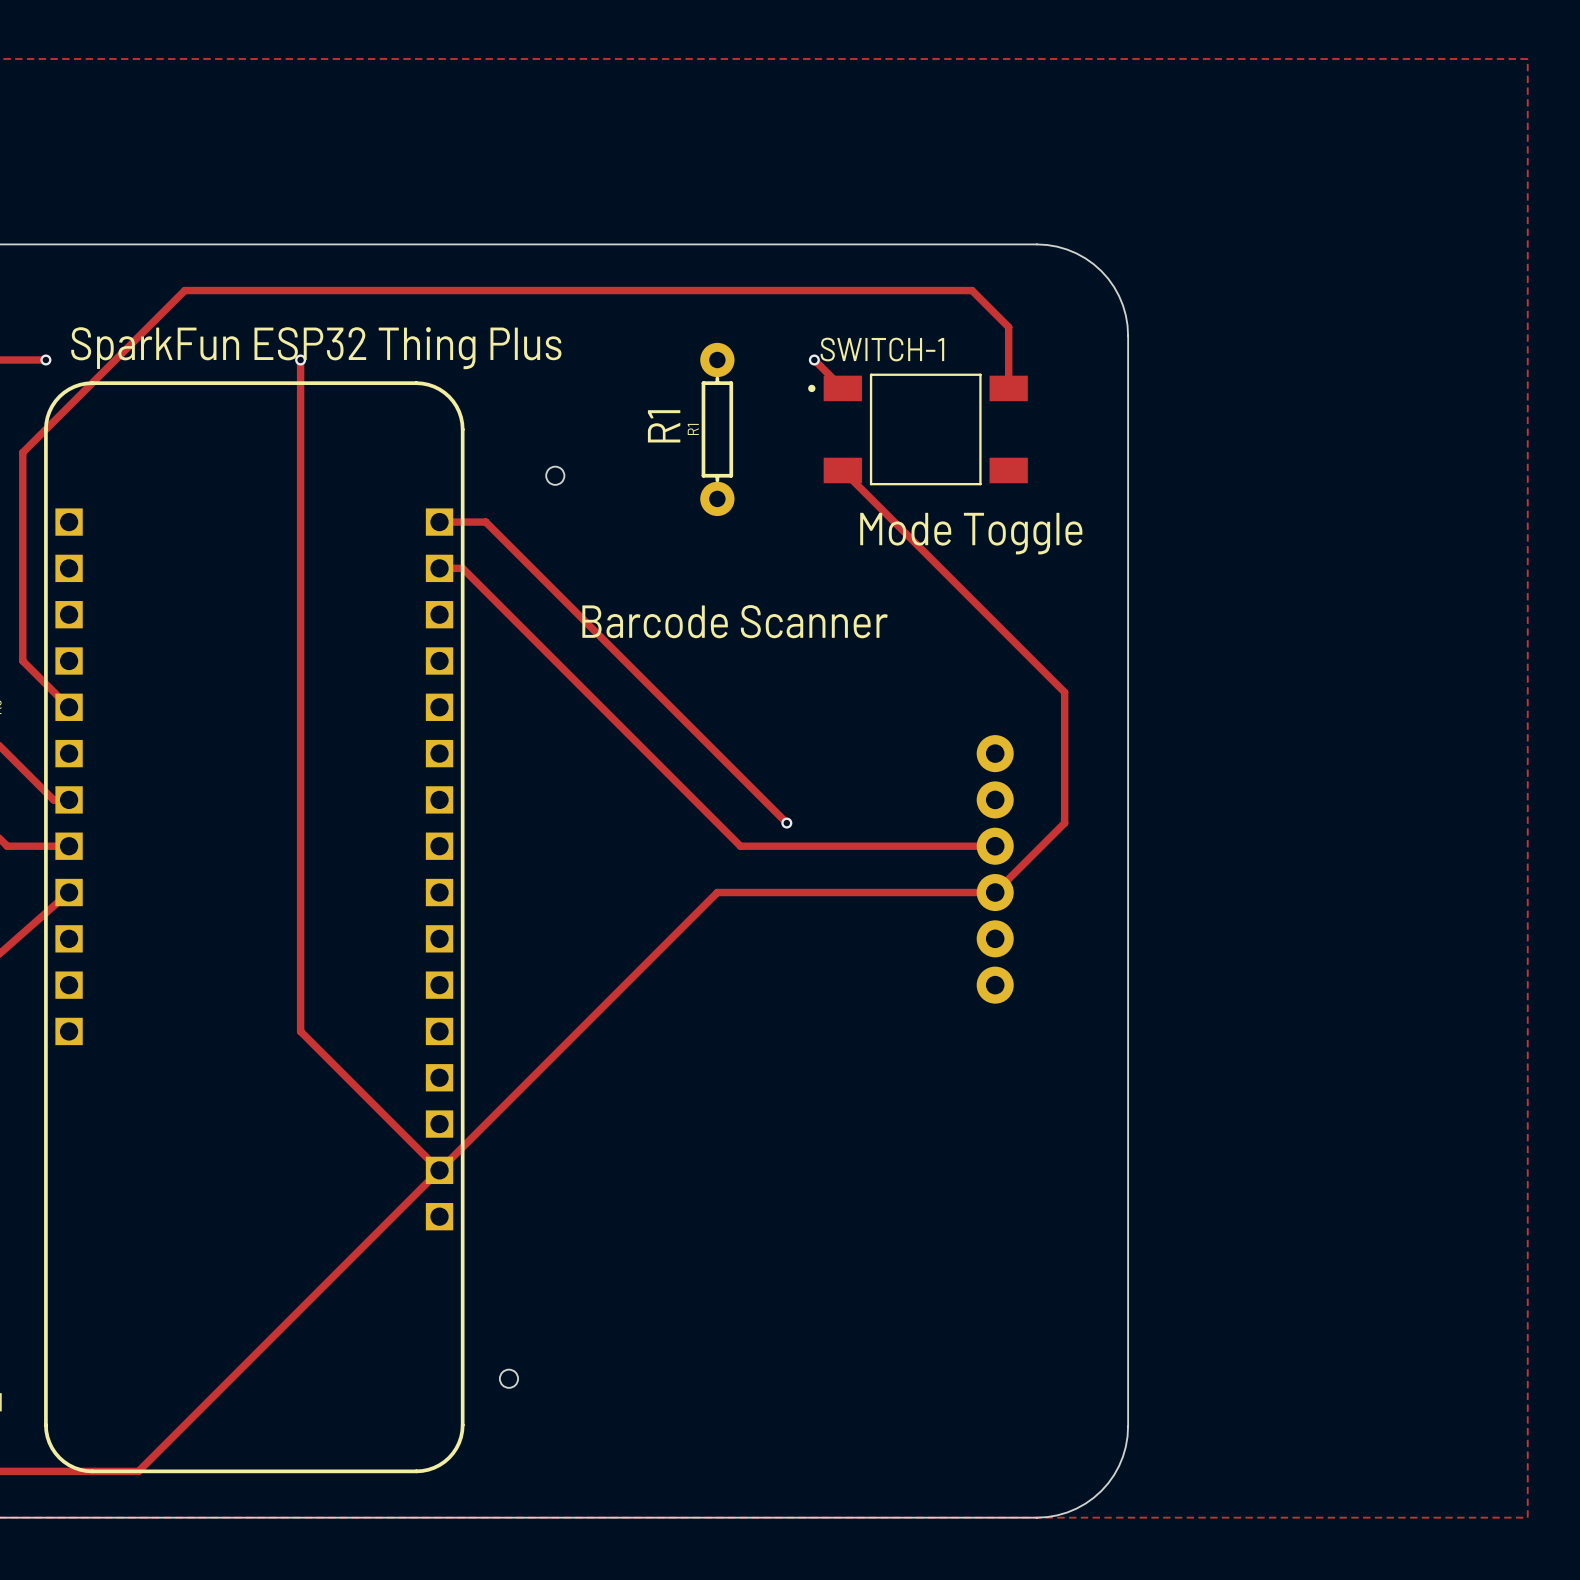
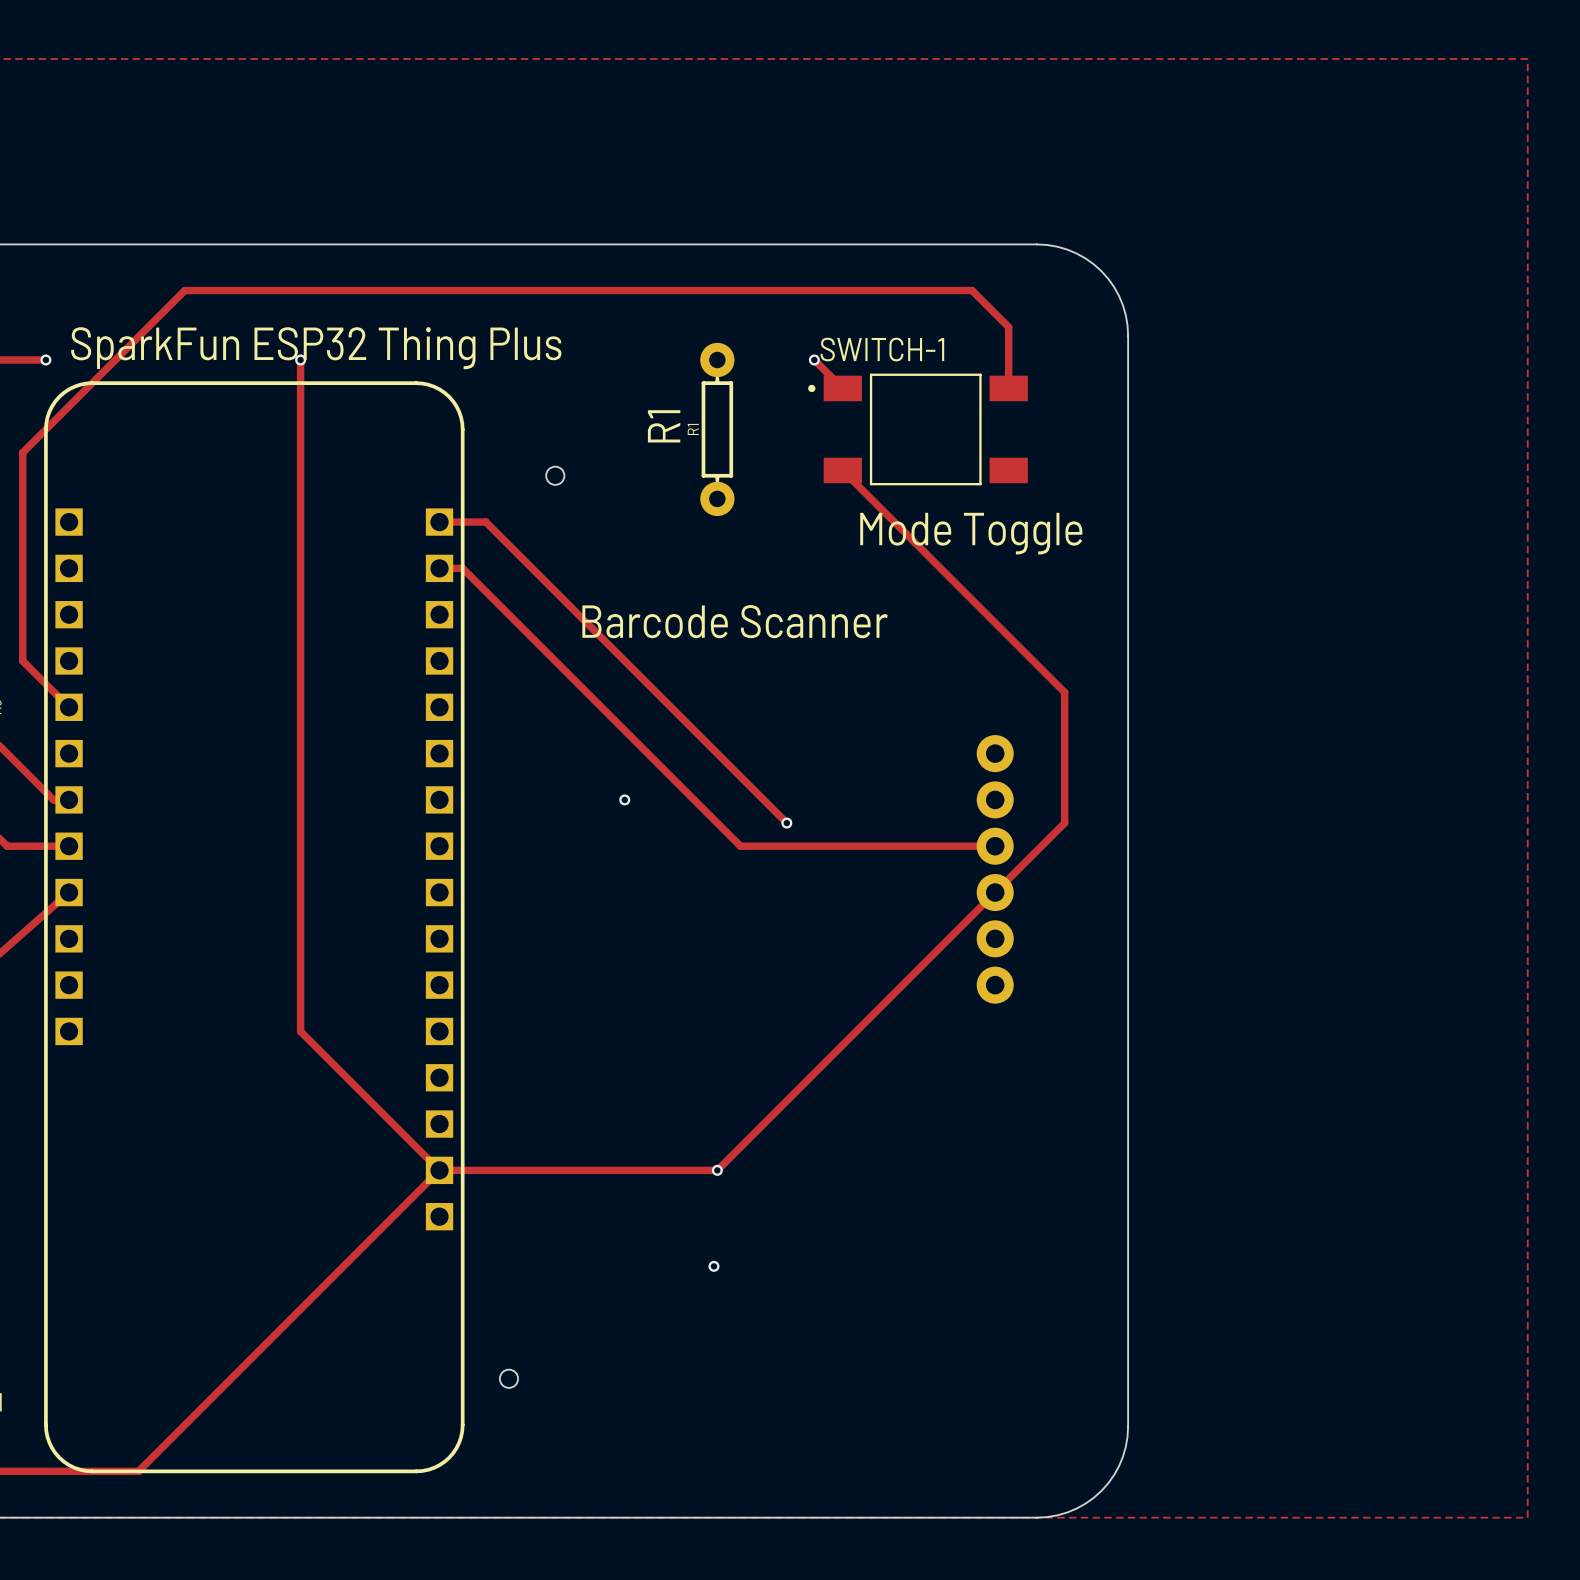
via: none -> (624, 799)
track: (995, 892) (717, 892) (439, 1170) -> (995, 892) (717, 1170) (439, 1170)
via: none -> (717, 1170)
via: none -> (713, 1266)

